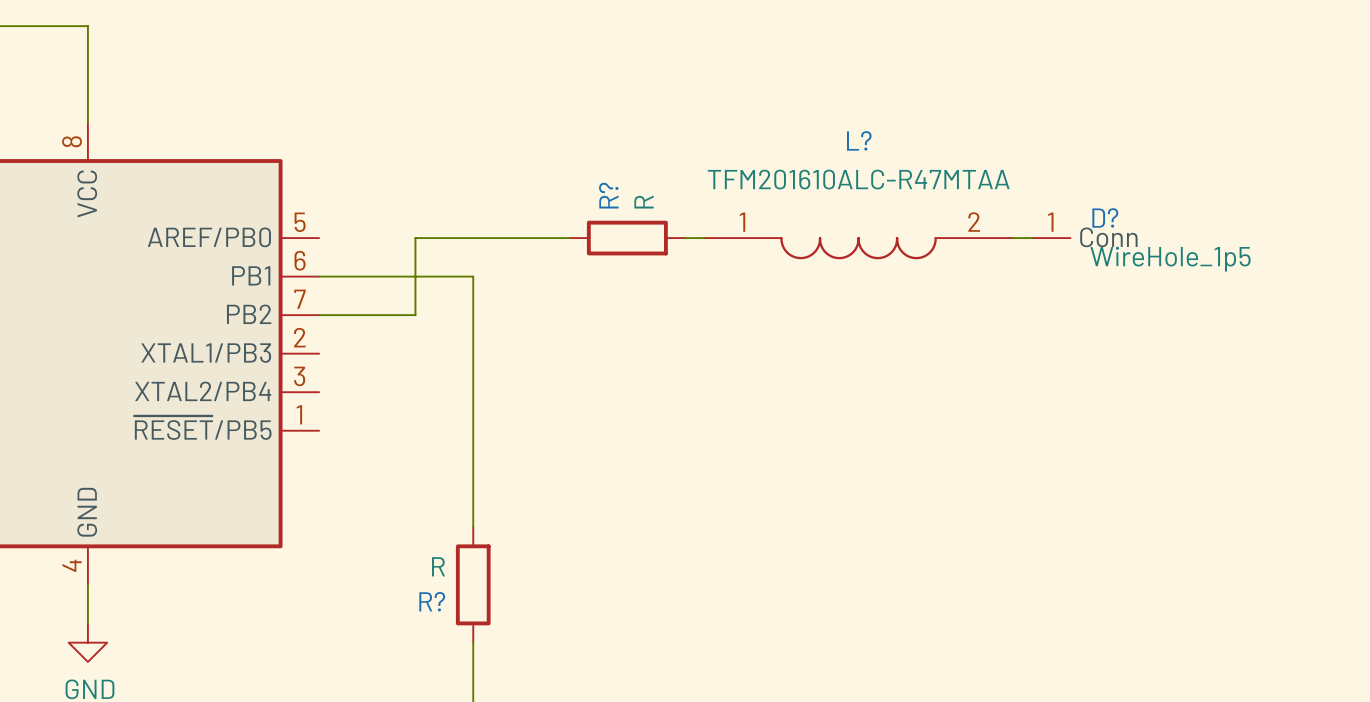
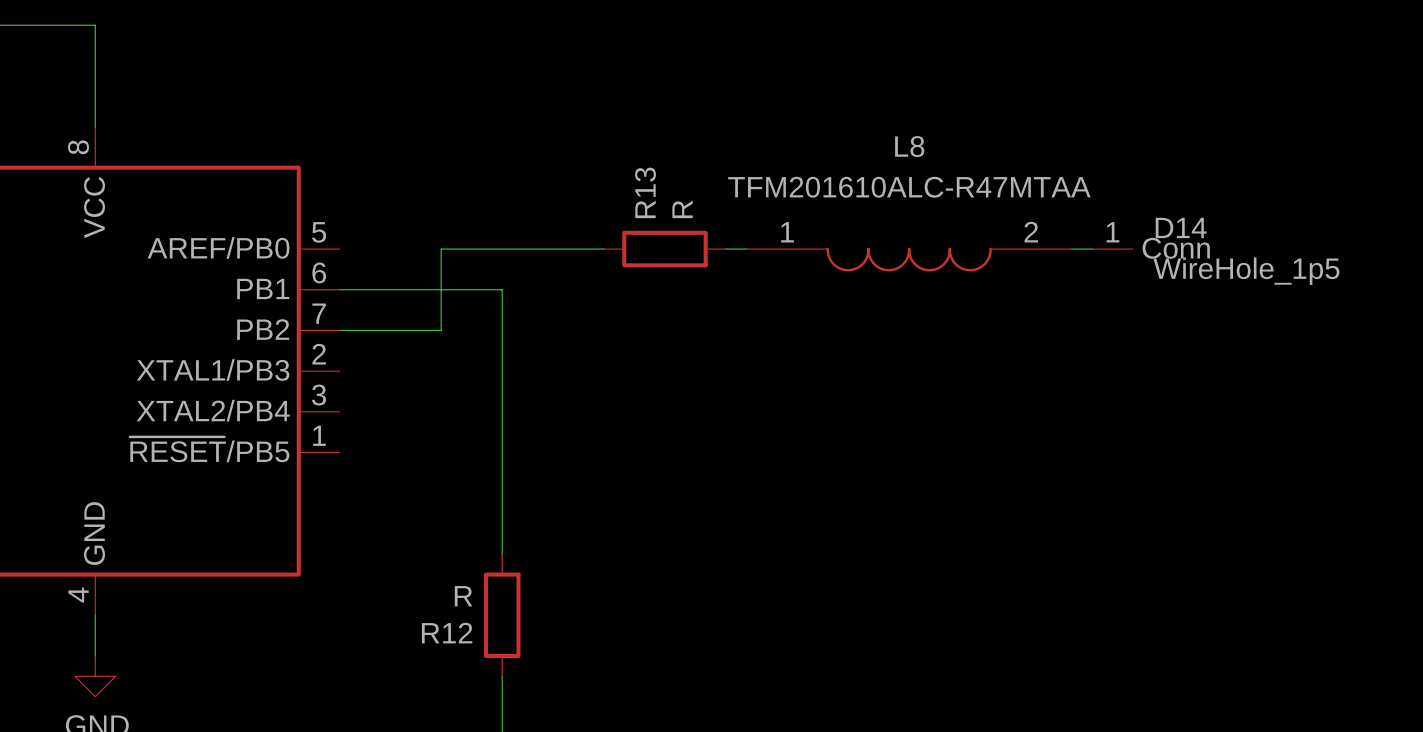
L? name: L? (859, 140) -> L8 (909, 146)
R? name: R? (608, 195) -> R13 (645, 192)
D? name: D? (1105, 217) -> D14 (1181, 227)
R? name: R? (432, 601) -> R12 (447, 633)

